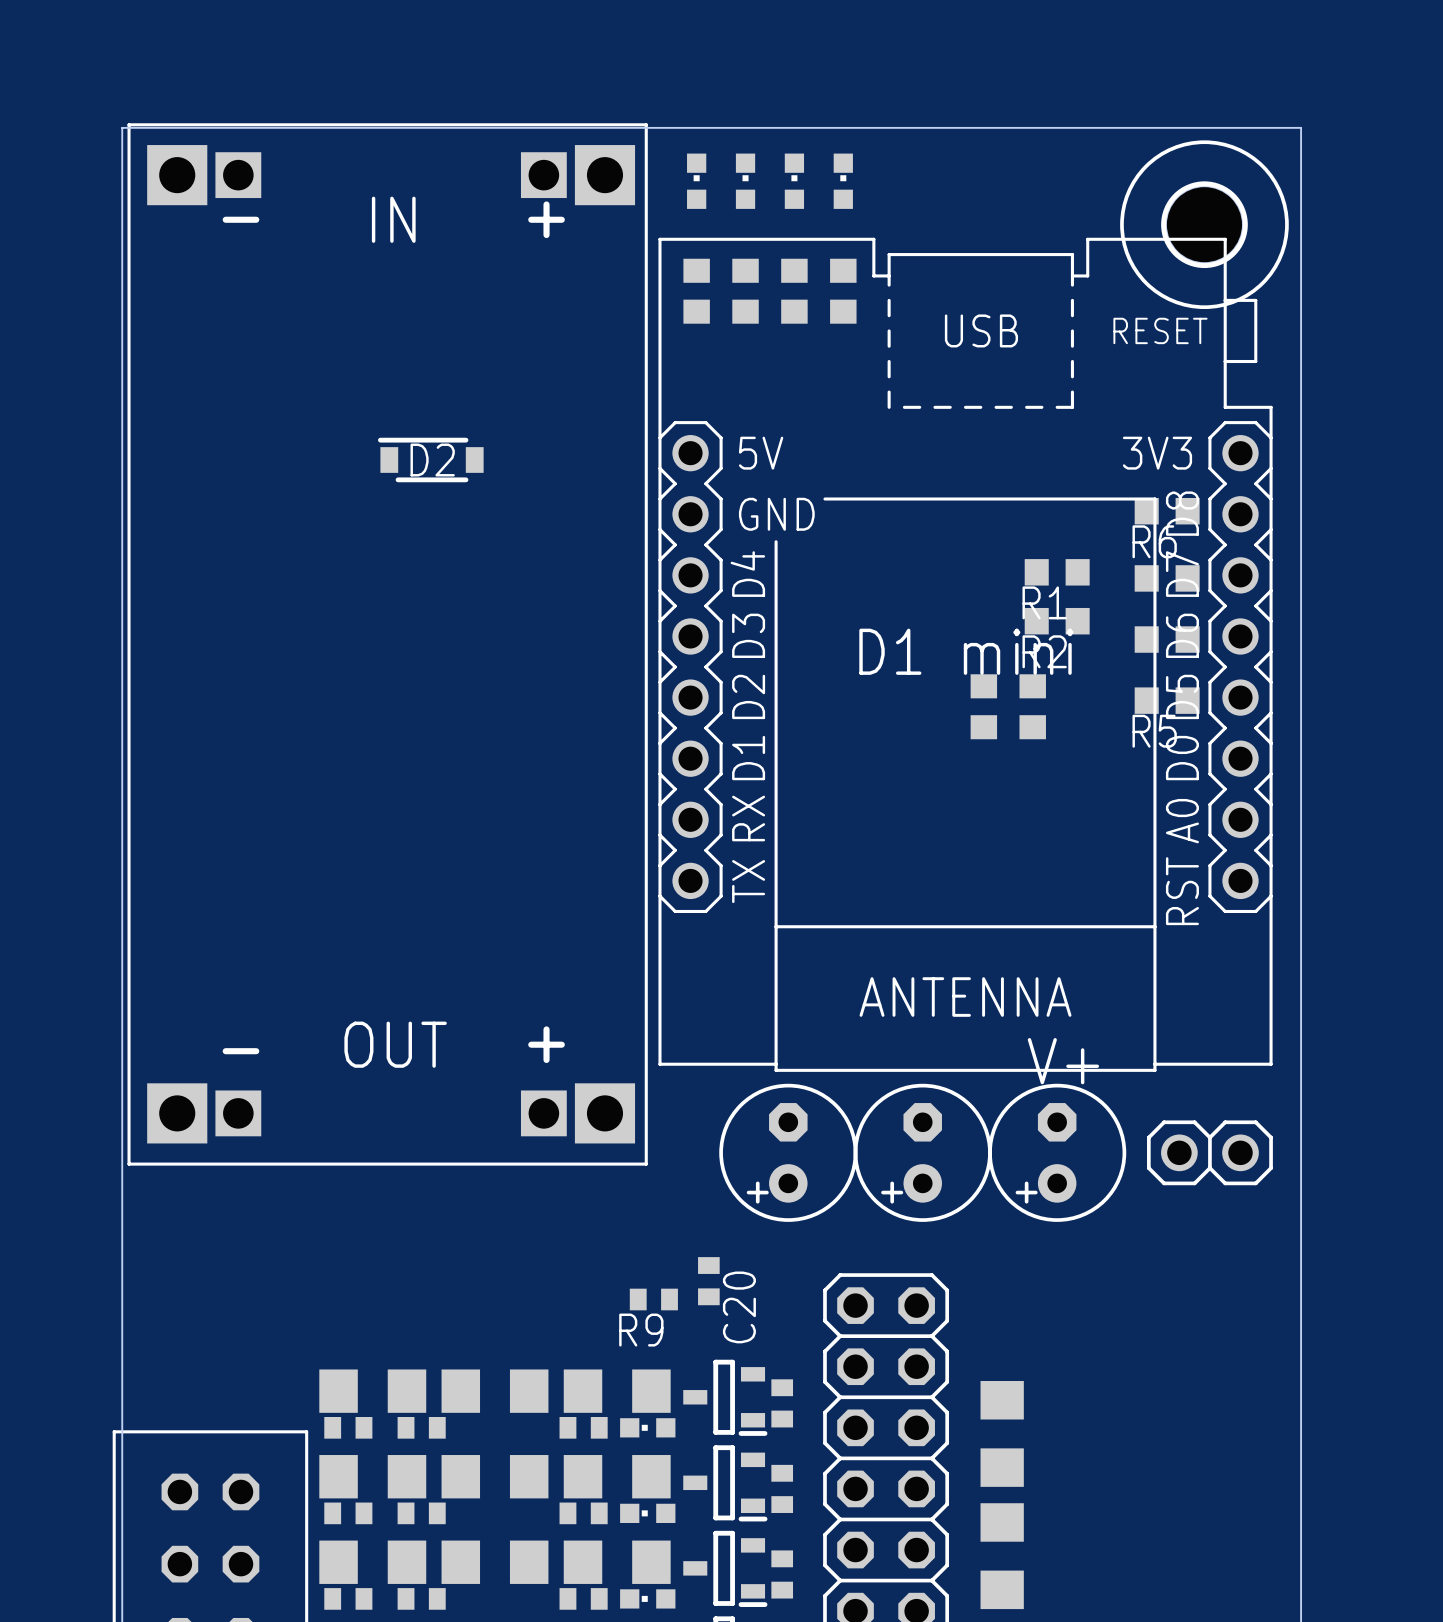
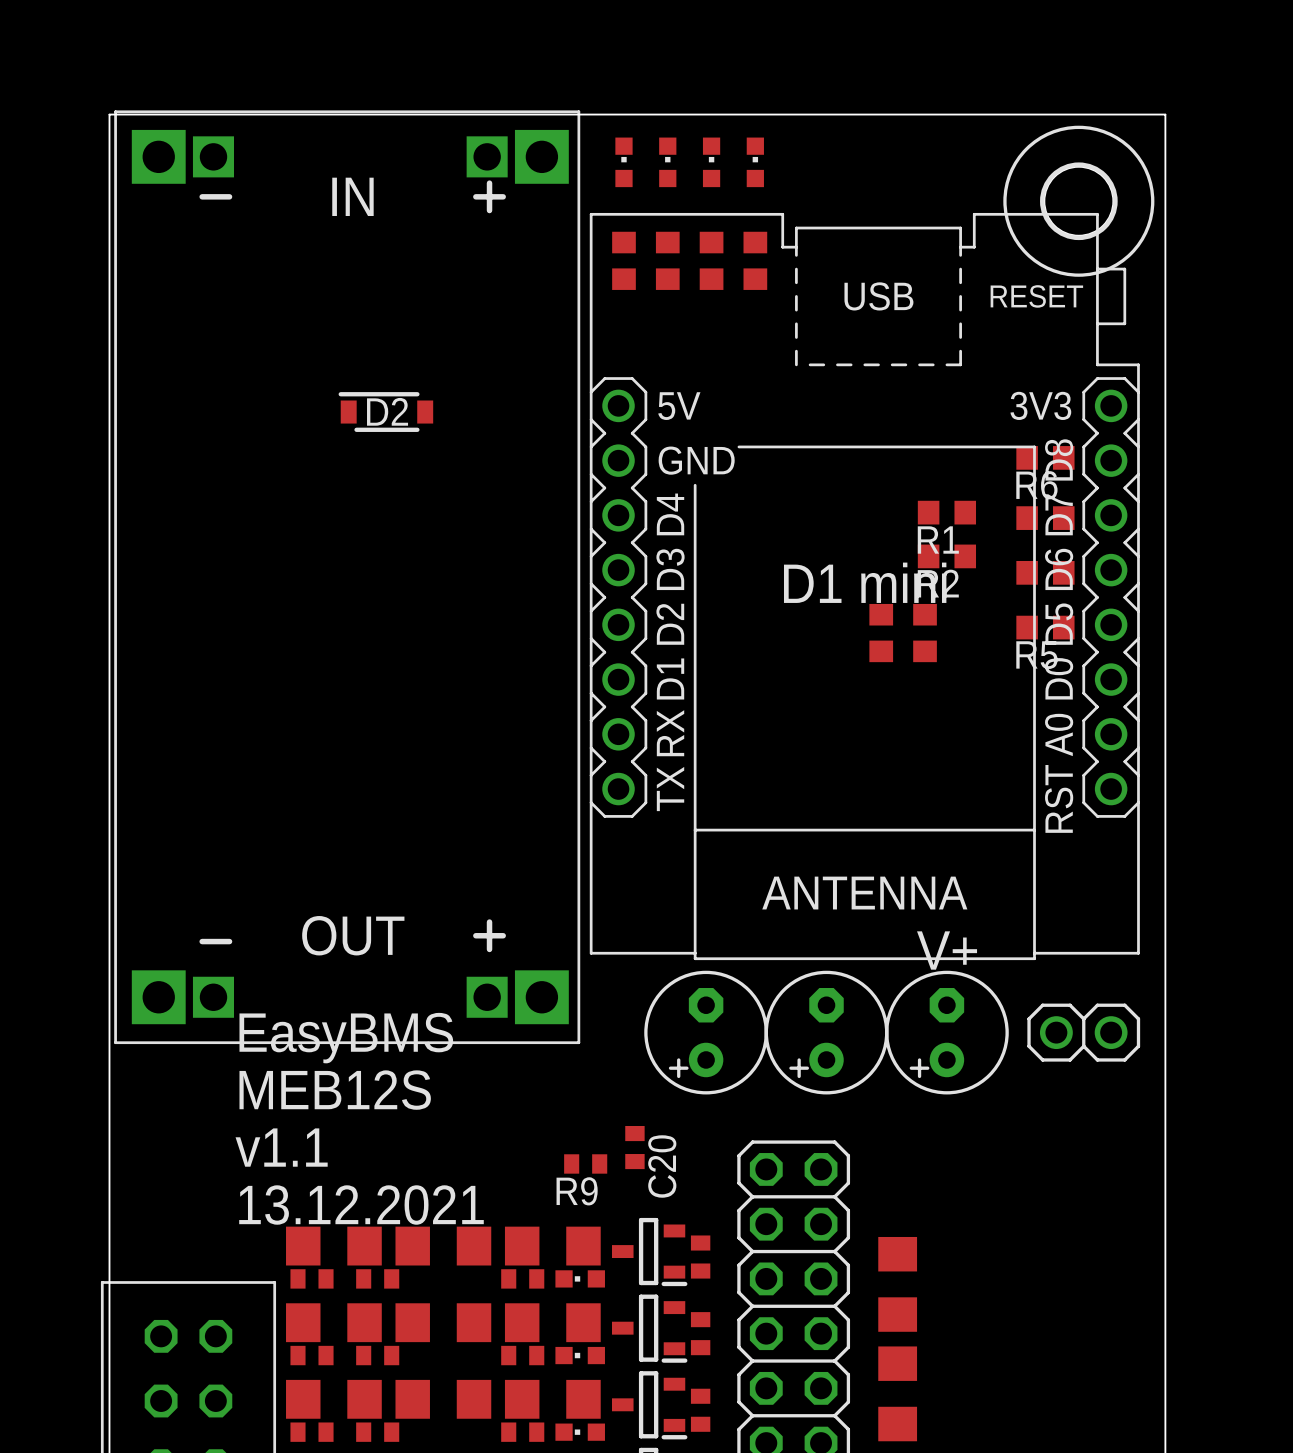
text: none -> EasyBMS (346, 1038)
text: none -> MEB12S (335, 1090)
text: none -> v1.1 (281, 1147)
text: none -> 13.12.2021 (361, 1205)

